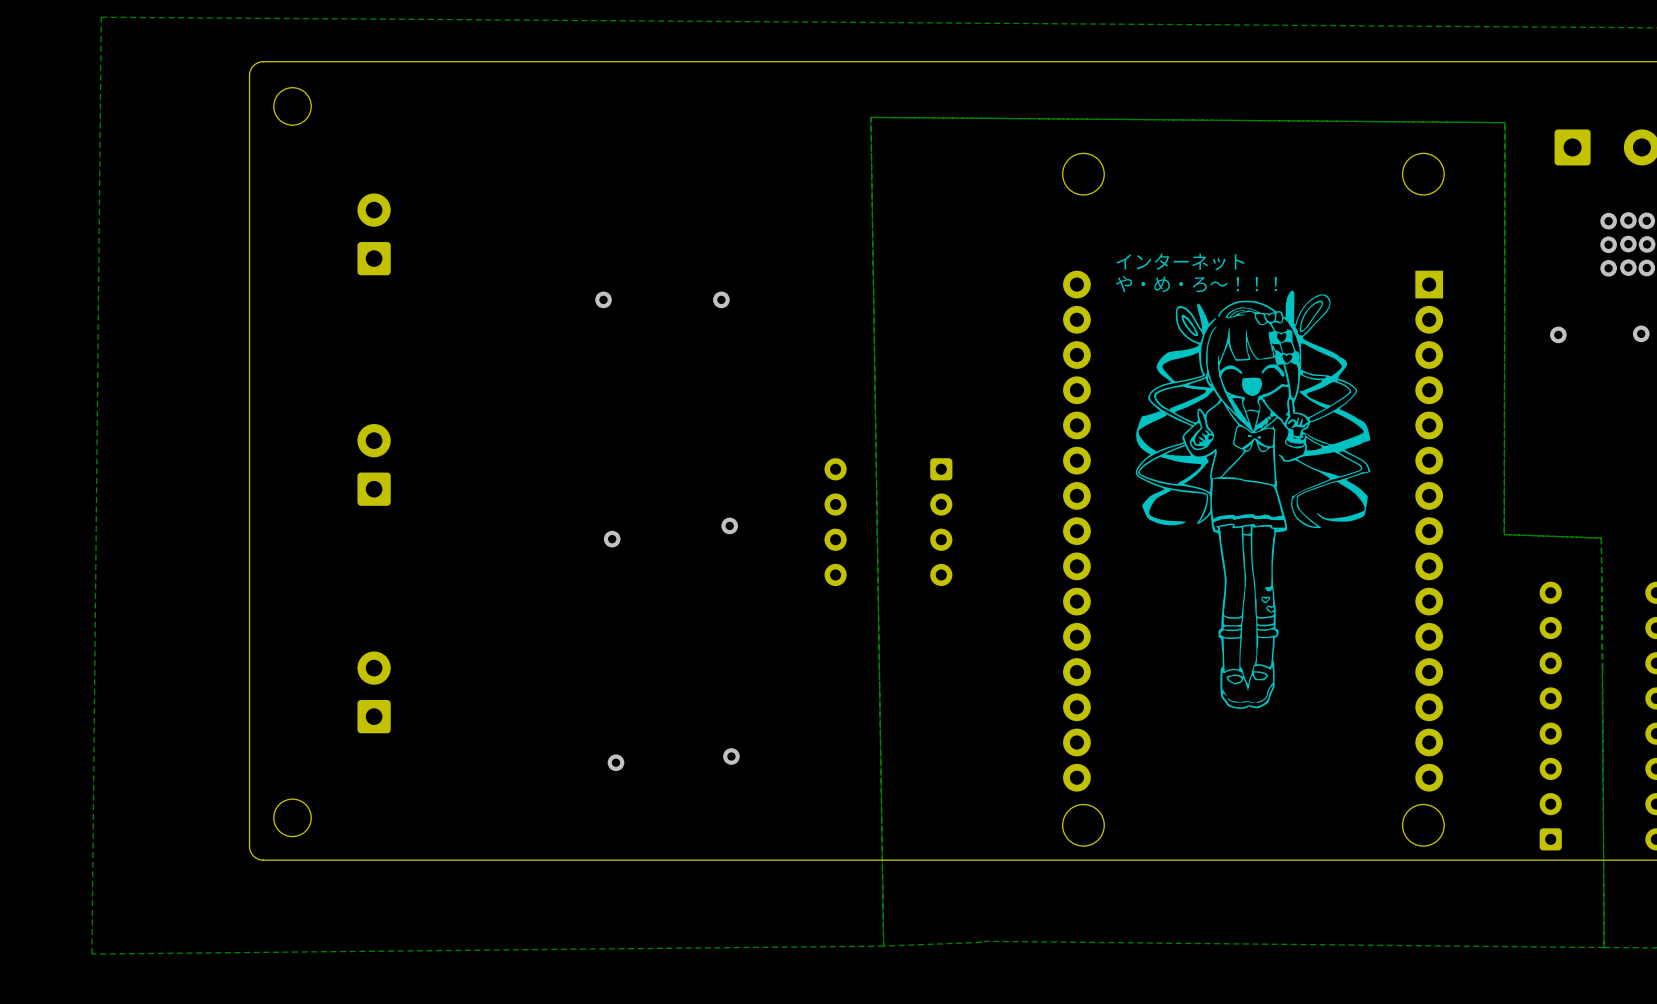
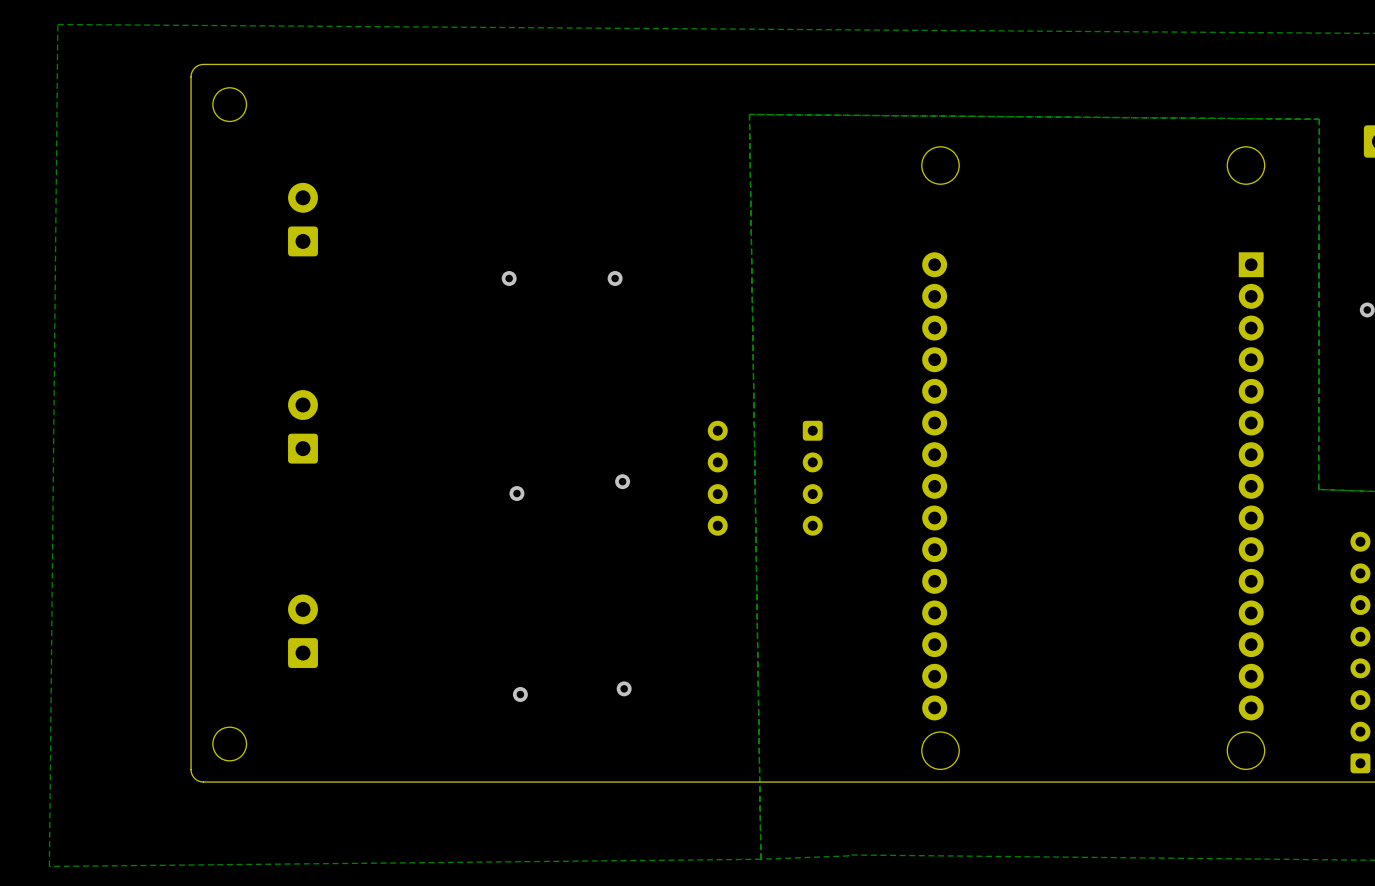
text: インターネット (1180, 261) -> none
text: や・め・ろ～！！！ (1196, 284) -> none
drawing: [1135, 290, 1371, 709] -> none

